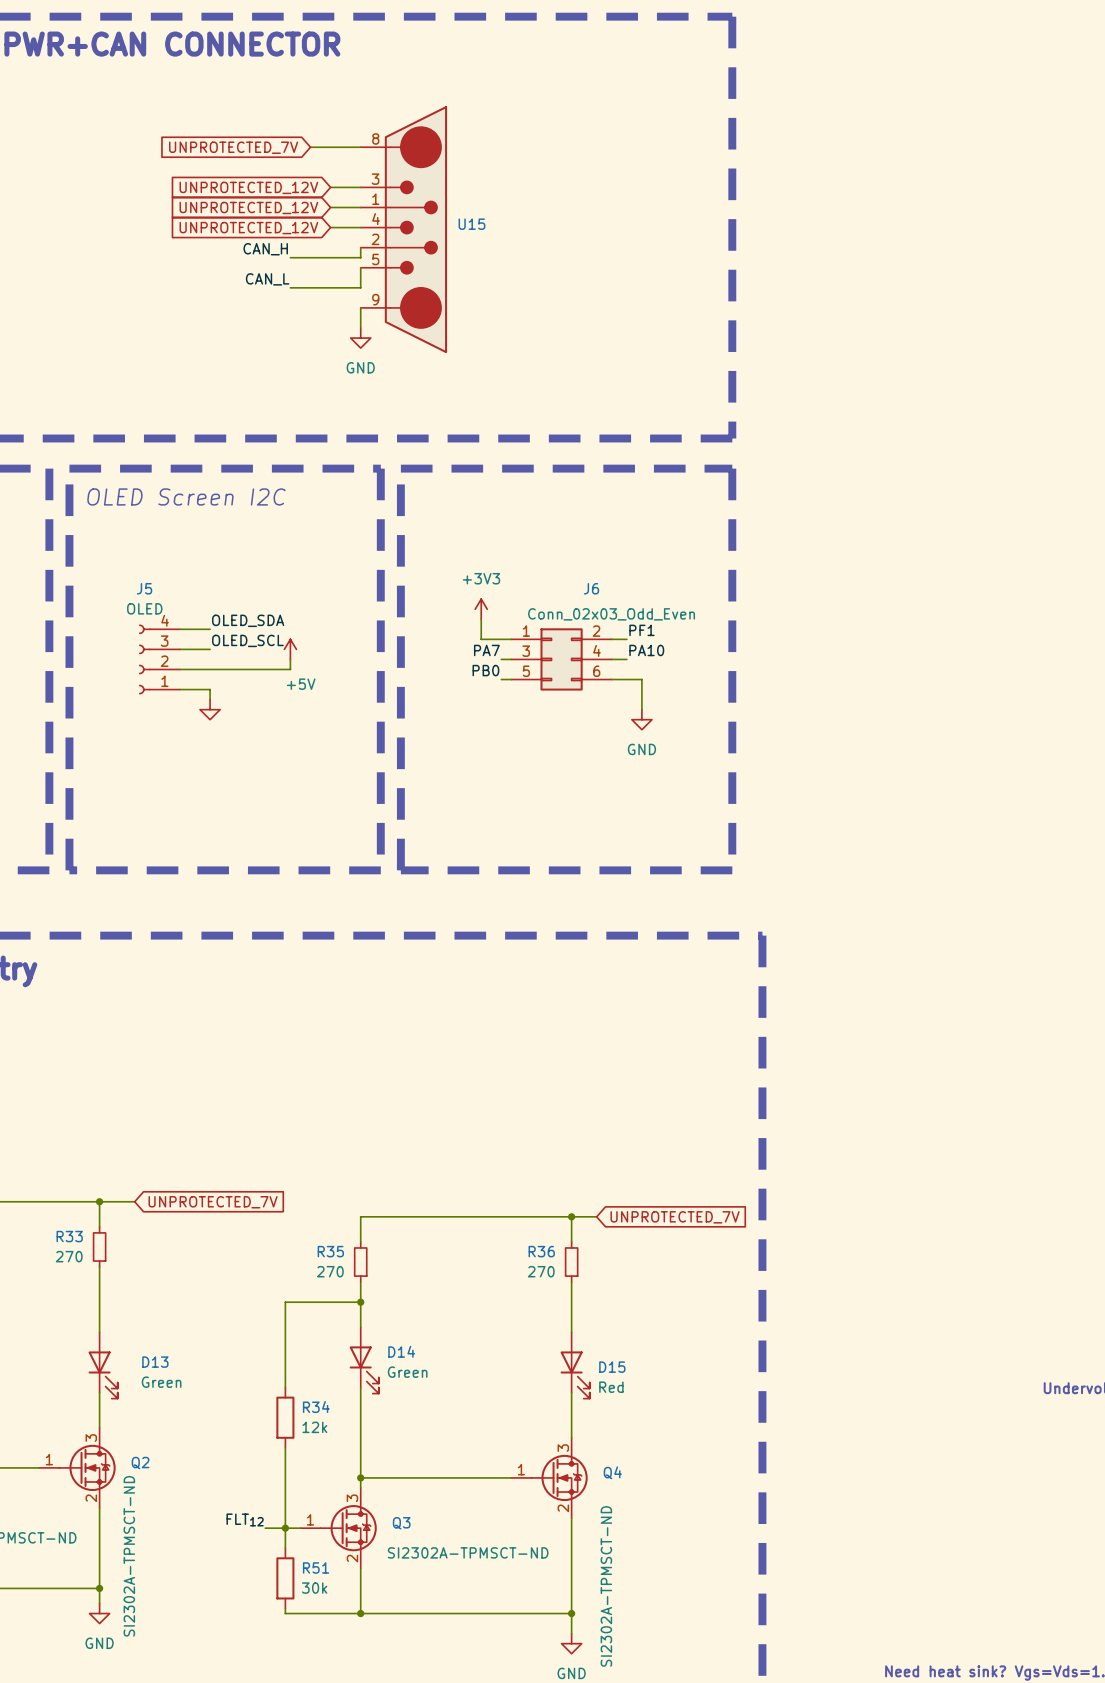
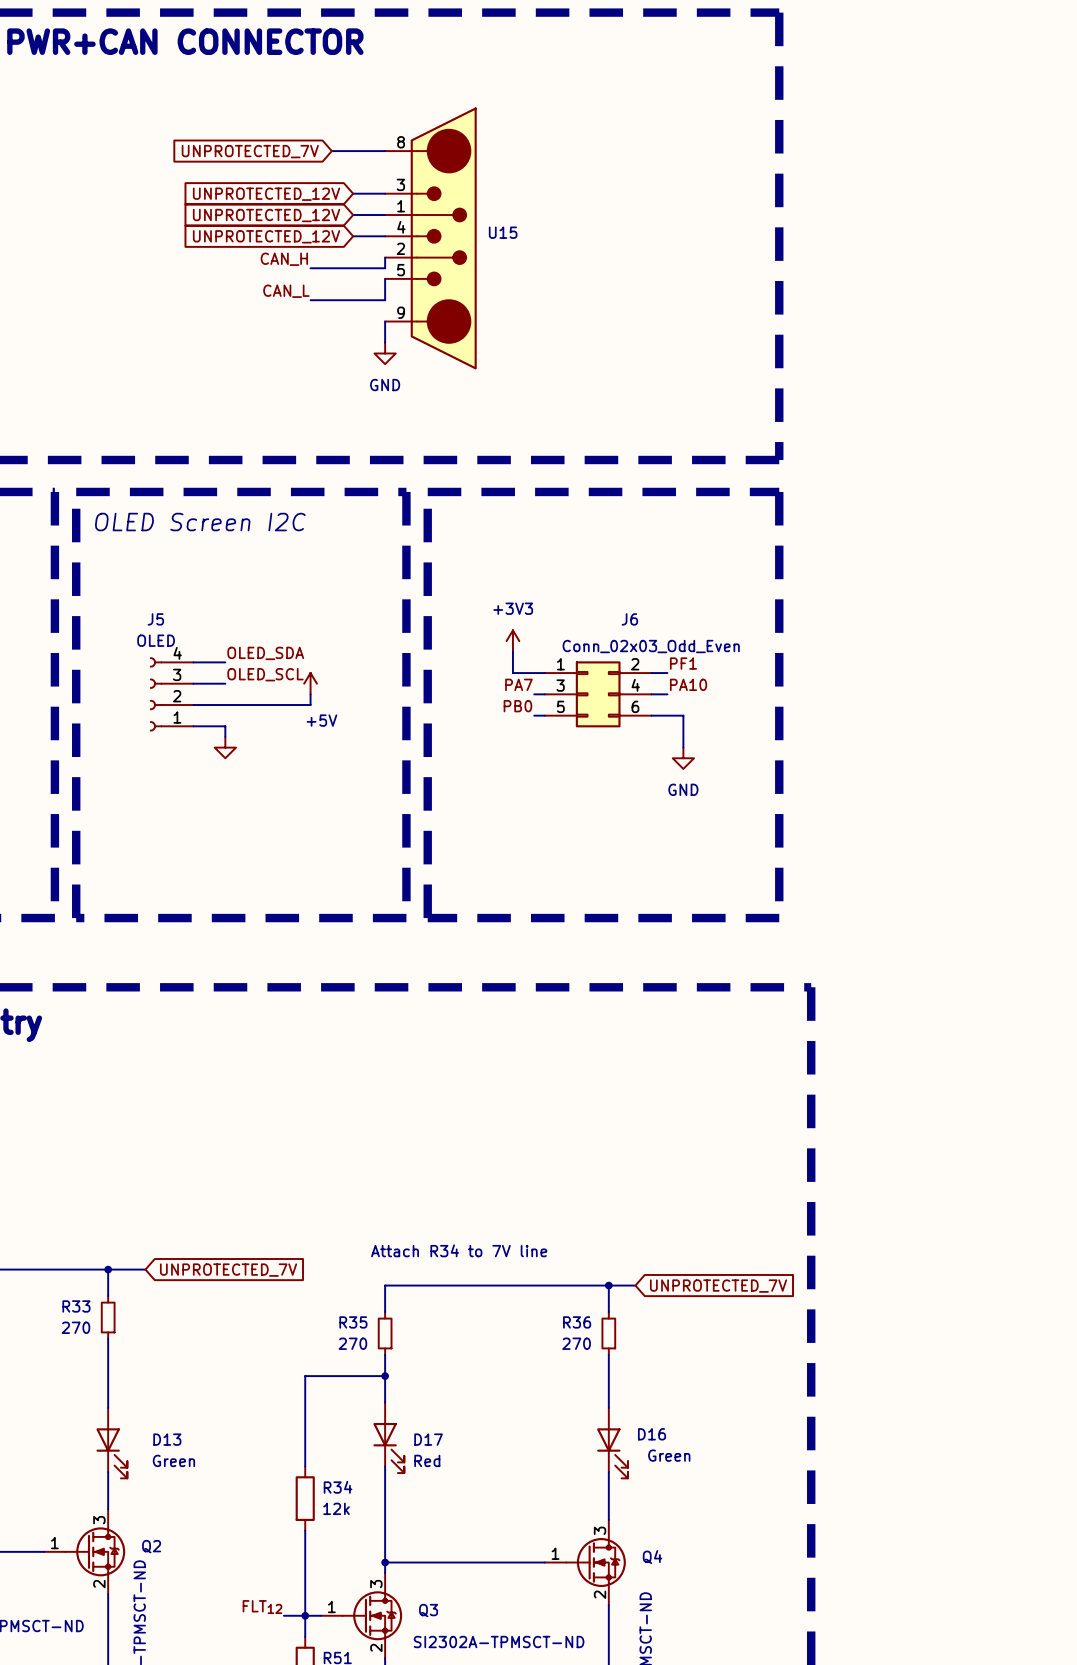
text: none -> Attach R34 to 7V line (459, 1250)
D14 name: D14 (401, 1351) -> D17 (428, 1439)
D15 name: D15 (612, 1367) -> D16 (652, 1434)
D14 value: Green (407, 1372) -> Red (427, 1460)
D15 value: Red (611, 1387) -> Green (669, 1455)

